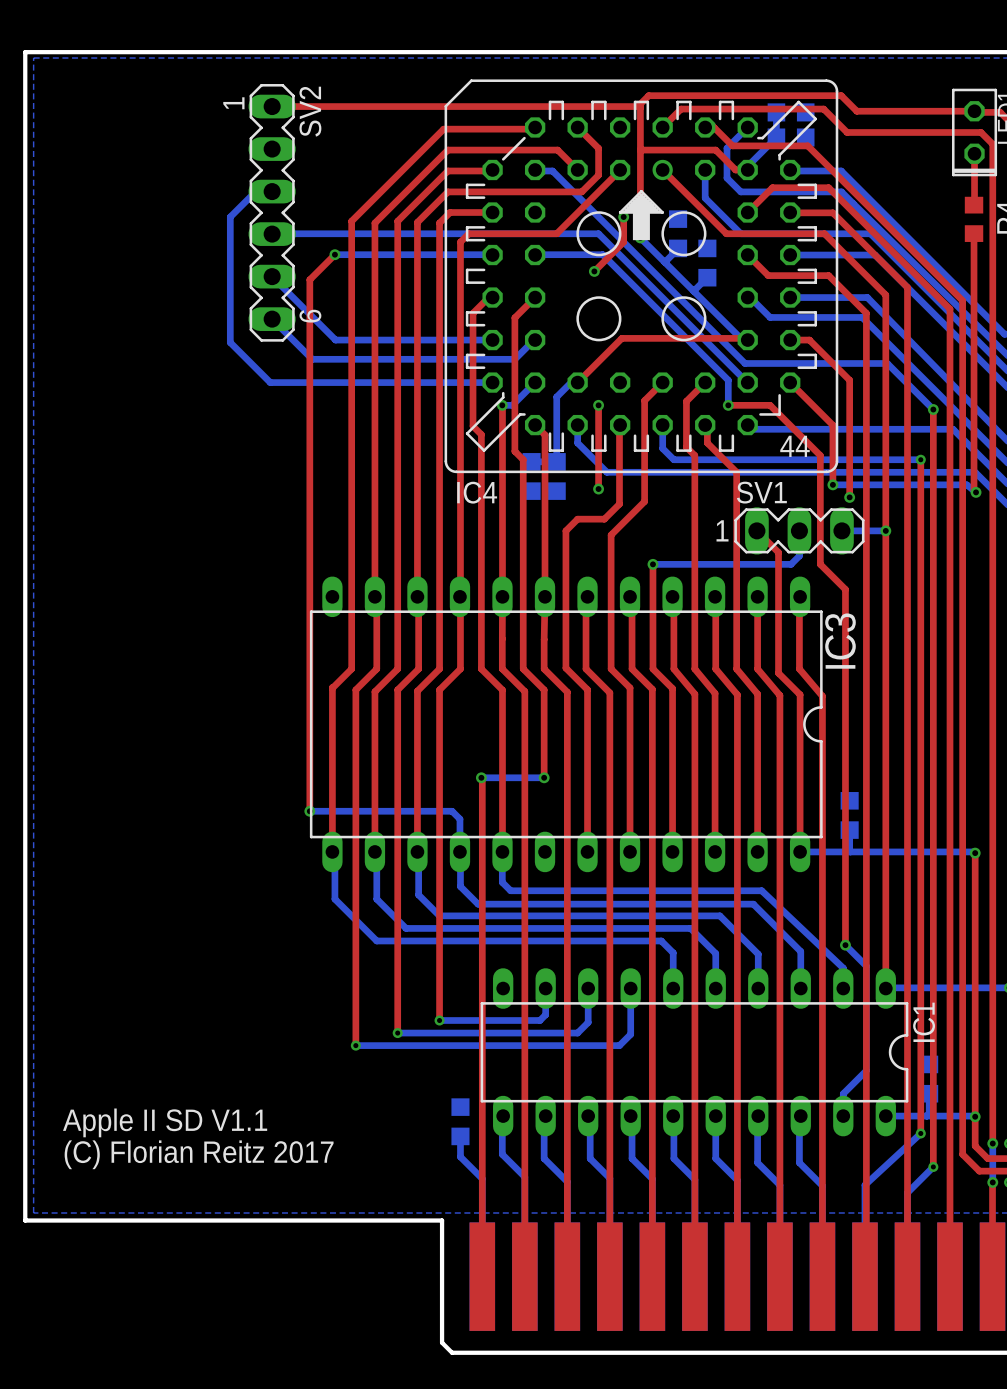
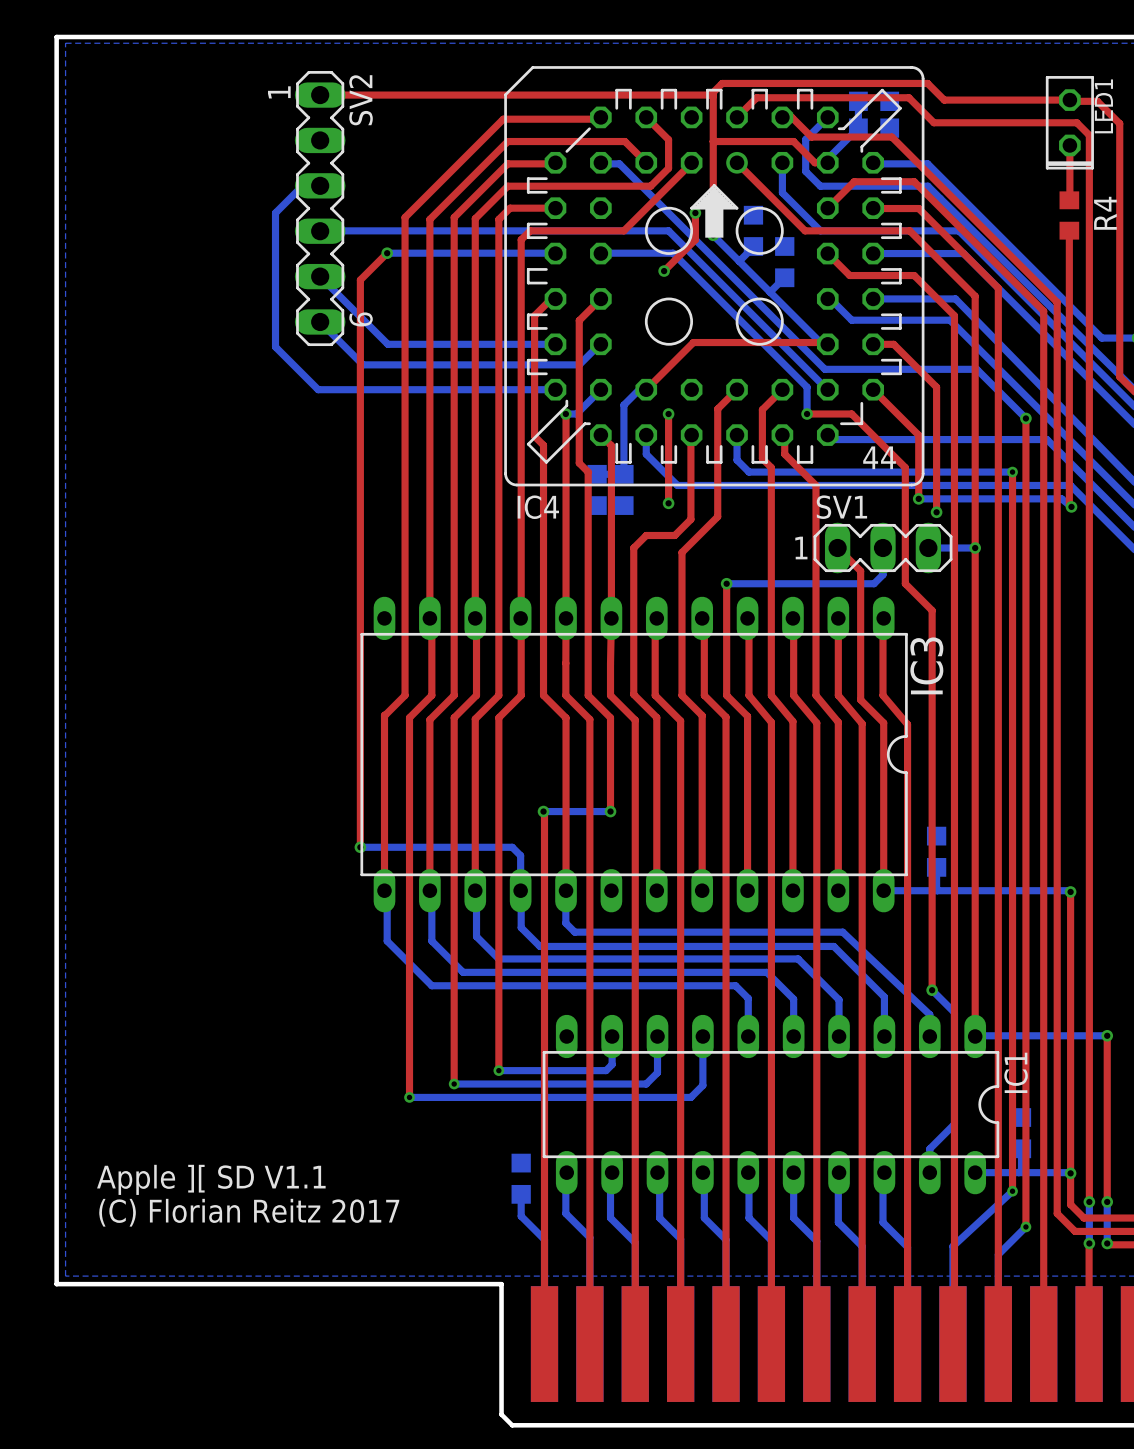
text: Apple II SD V1.1 (165, 1122) -> Apple ][ SD V1.1 (211, 1179)

